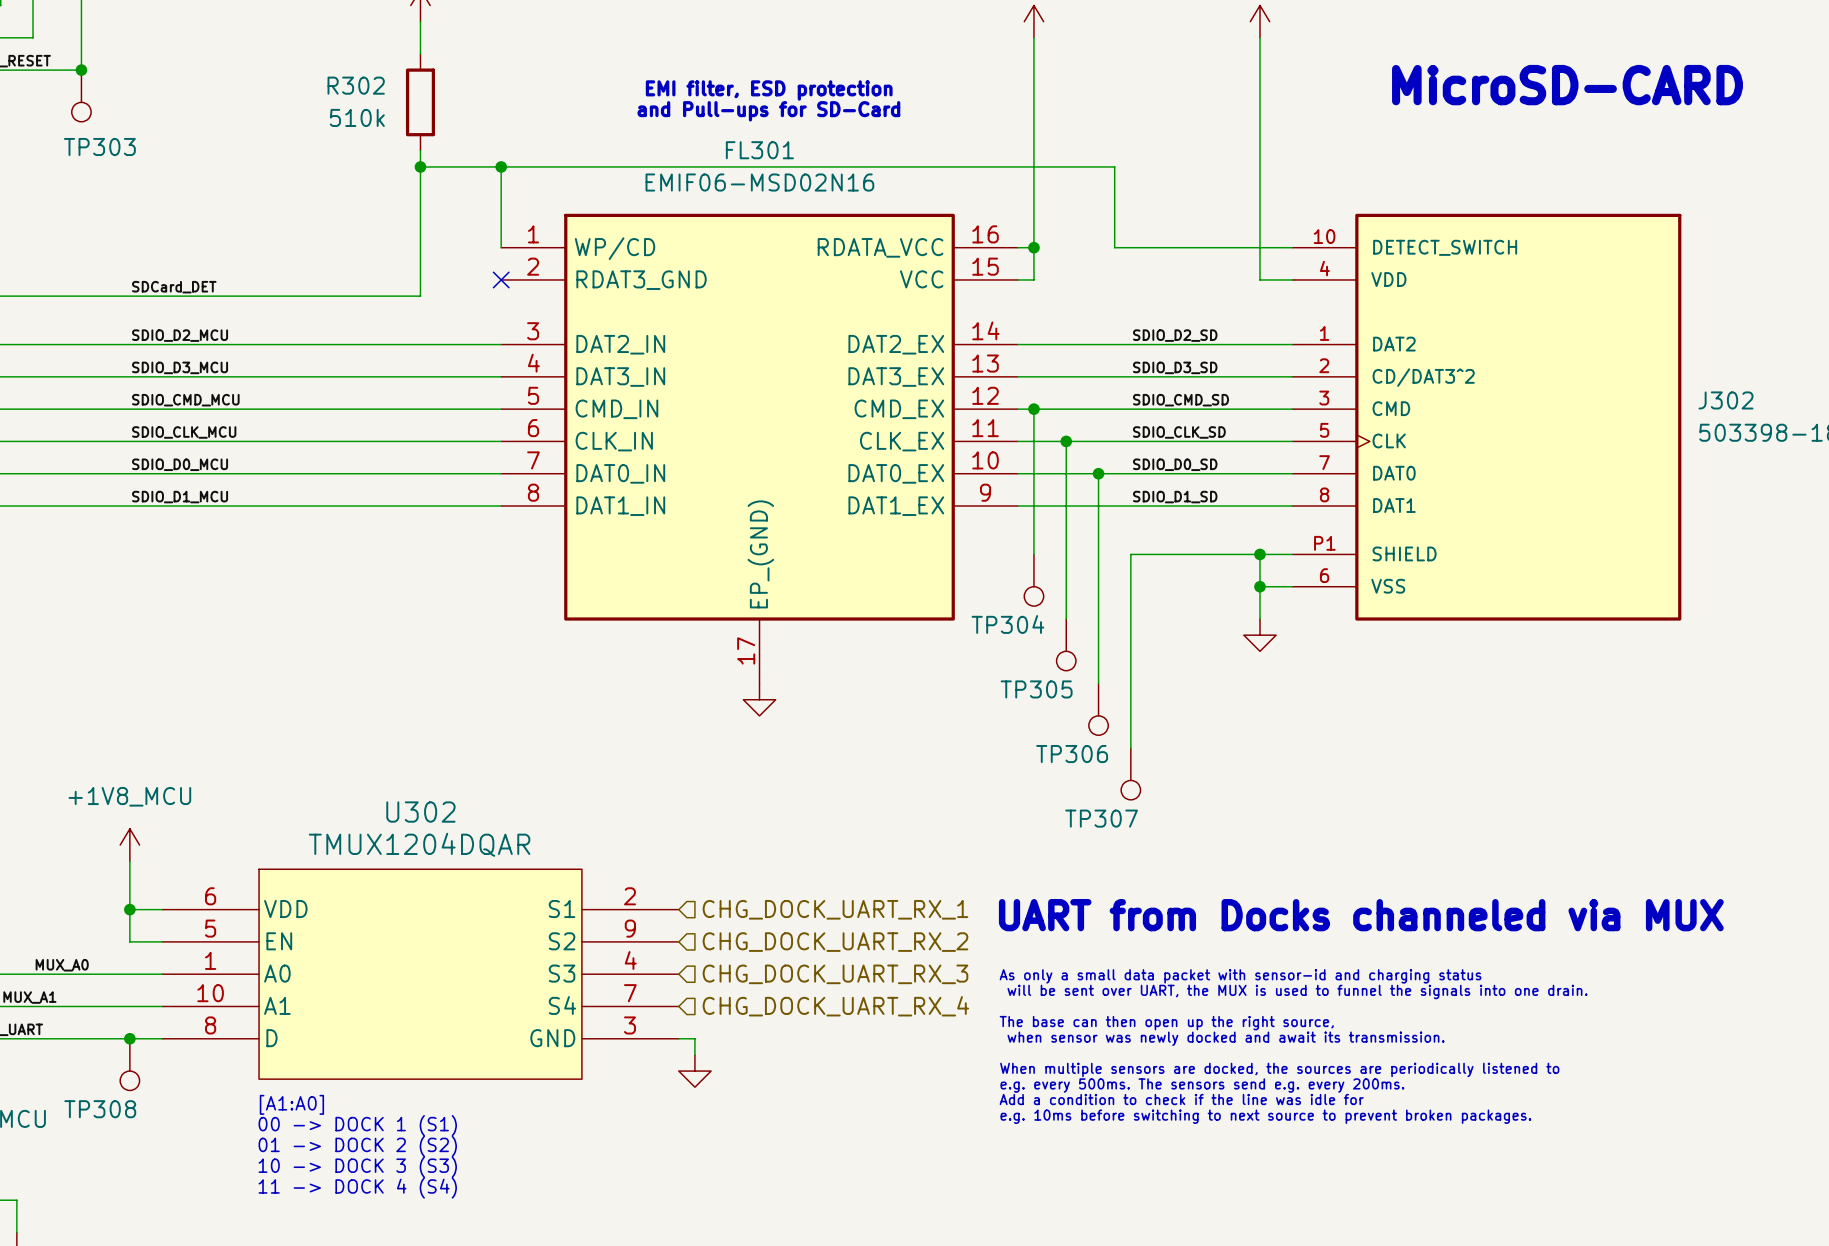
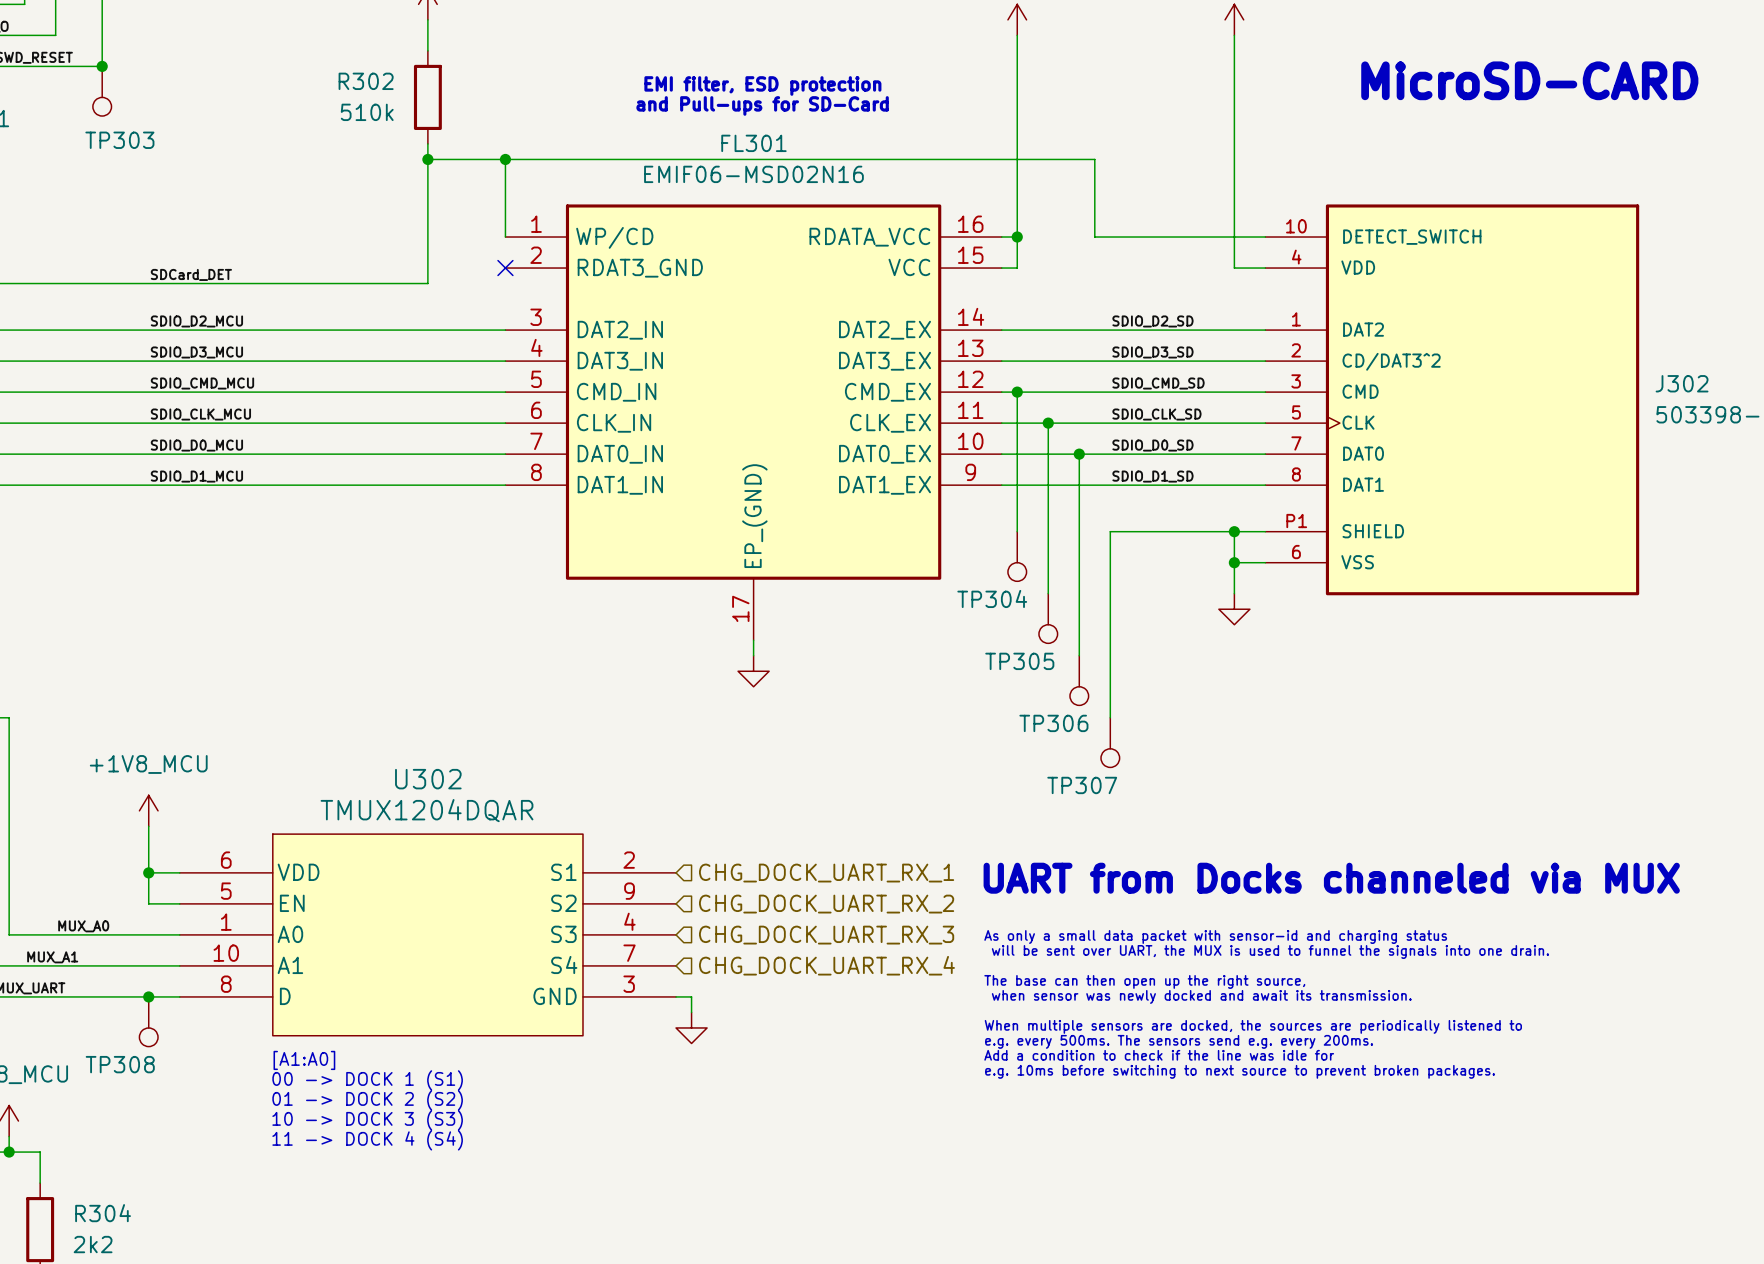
FL301 symbol: [501, 213, 1018, 684] -> [505, 204, 1002, 641]

